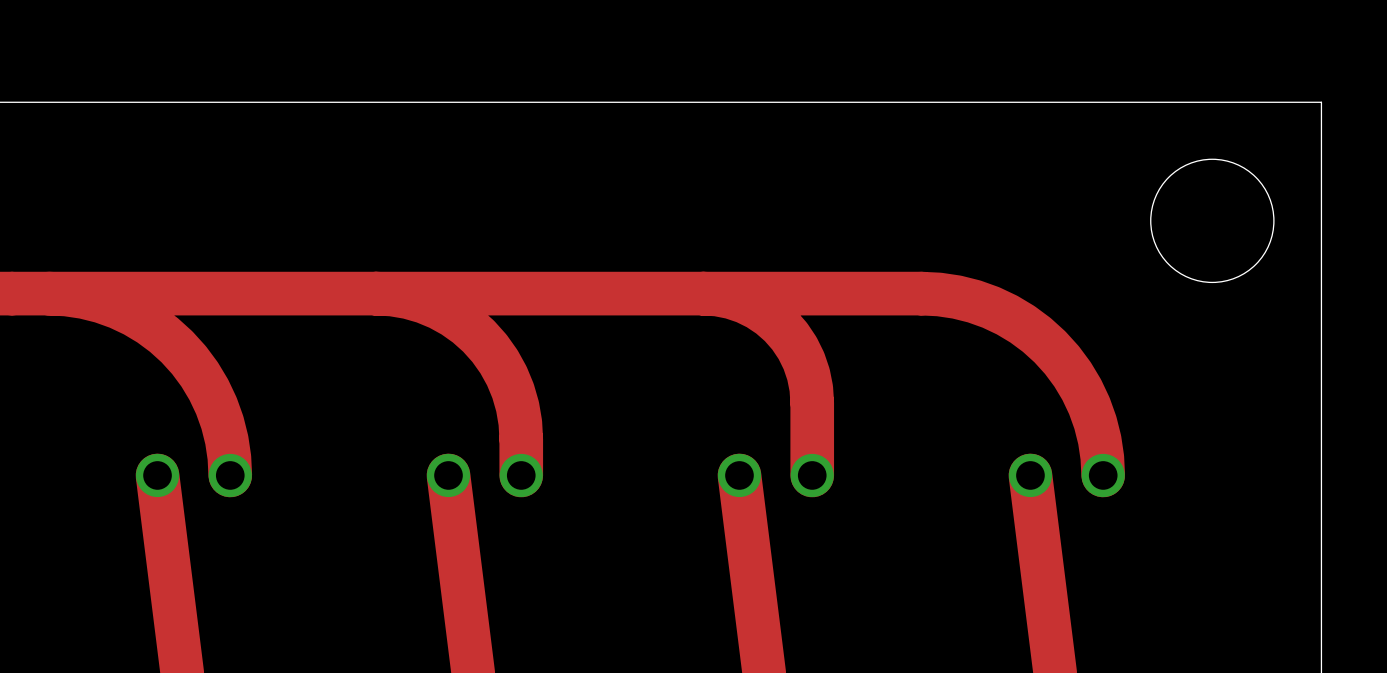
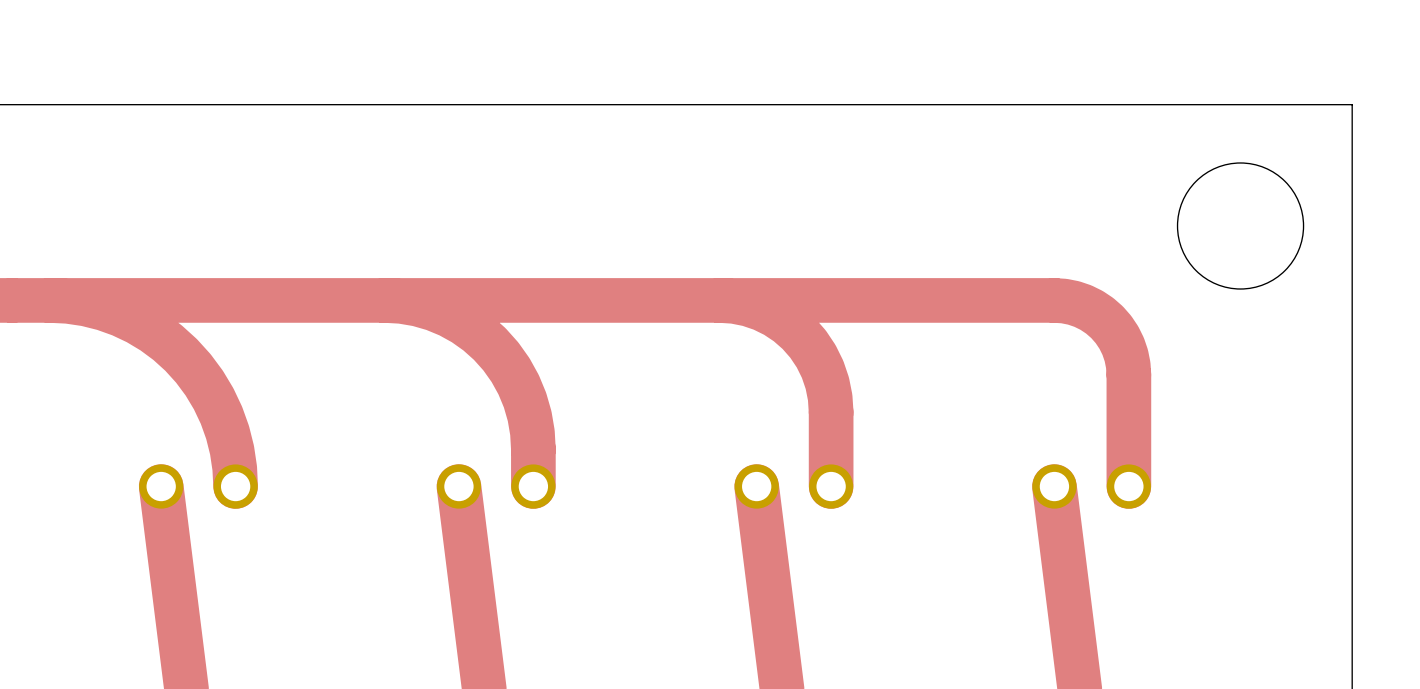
top track: (921, 293) (956, 297) (990, 307) (1022, 324) (1049, 346) (1072, 374) (1089, 405) (1099, 439) (1103, 475) -> (942, 300) (1064, 301) (1091, 310) (1107, 322) (1123, 346) (1128, 365) (1128, 486)

